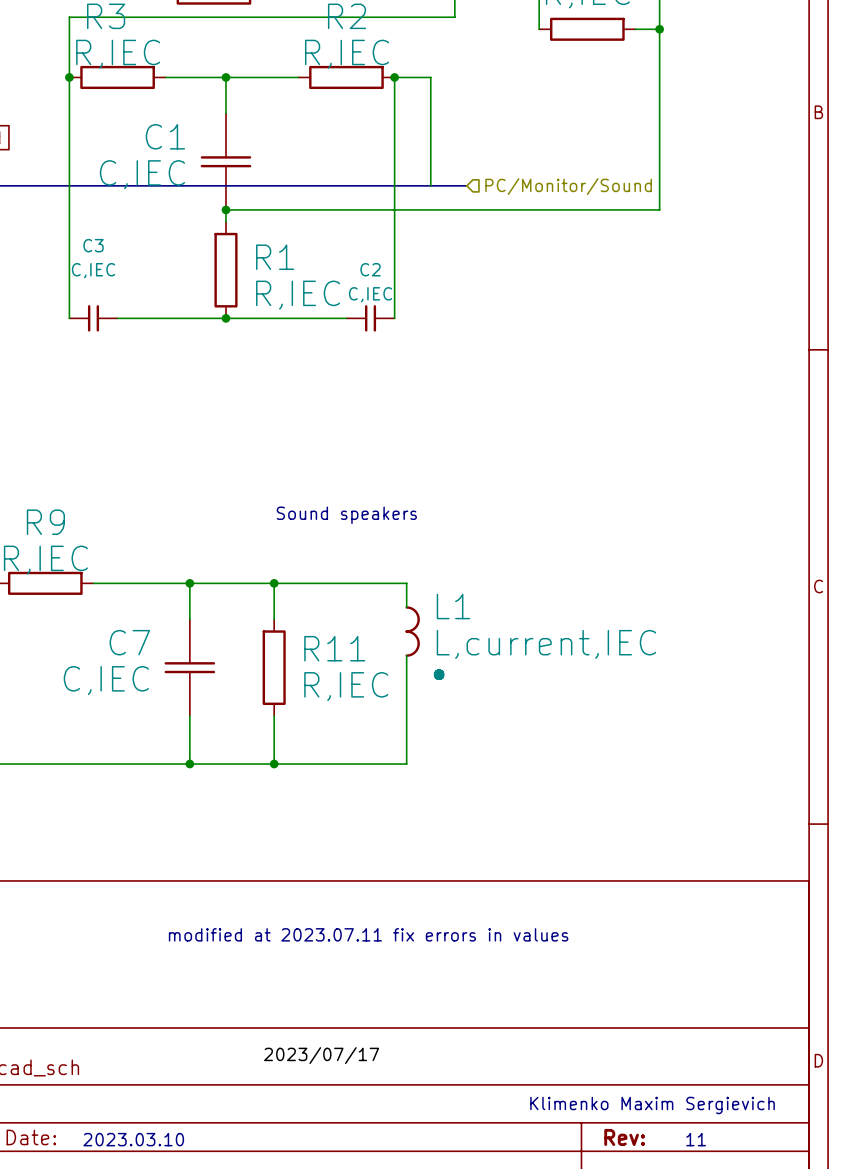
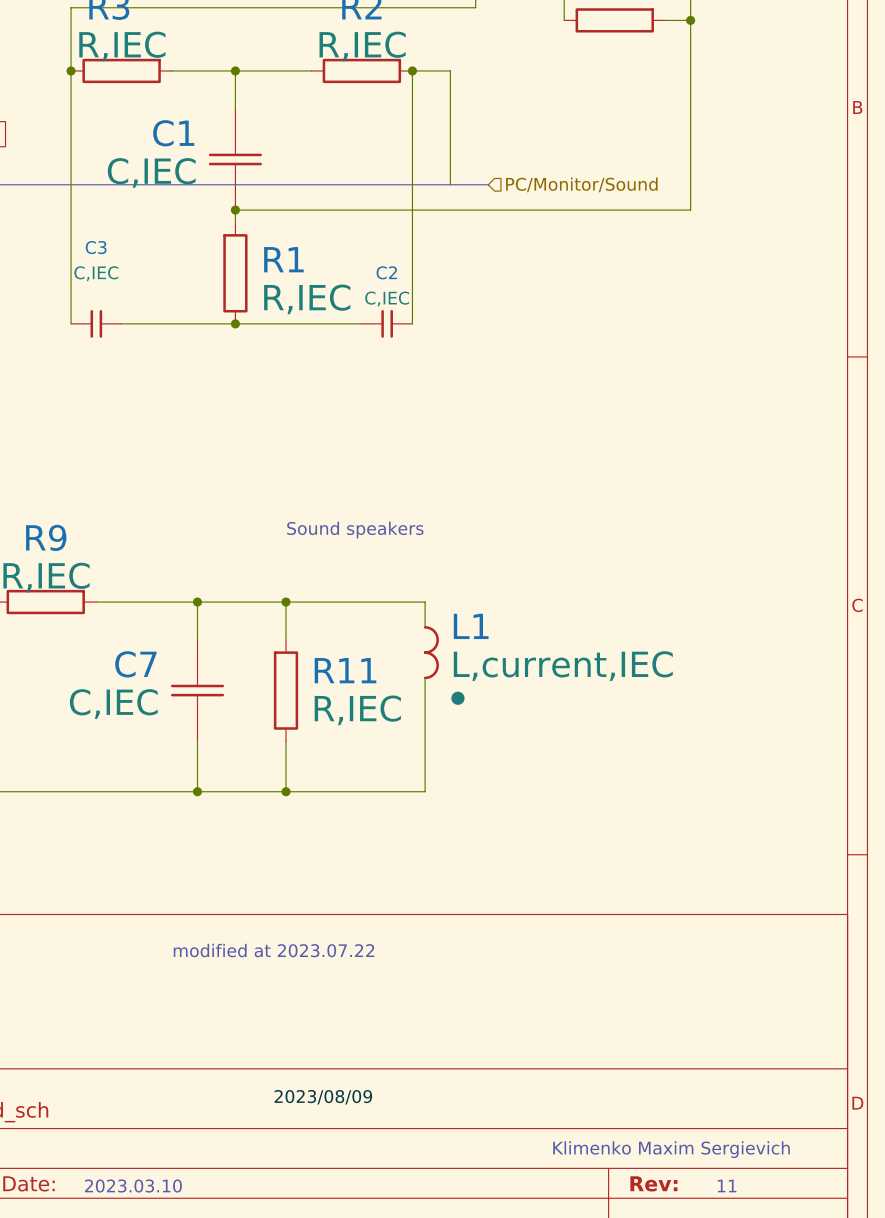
text: modified at 2023.07.11 fix errors in values (368, 934) -> modified at 2023.07.22 (273, 950)
label: 2023/07/17 (321, 1055) -> 2023/08/09 (323, 1097)

